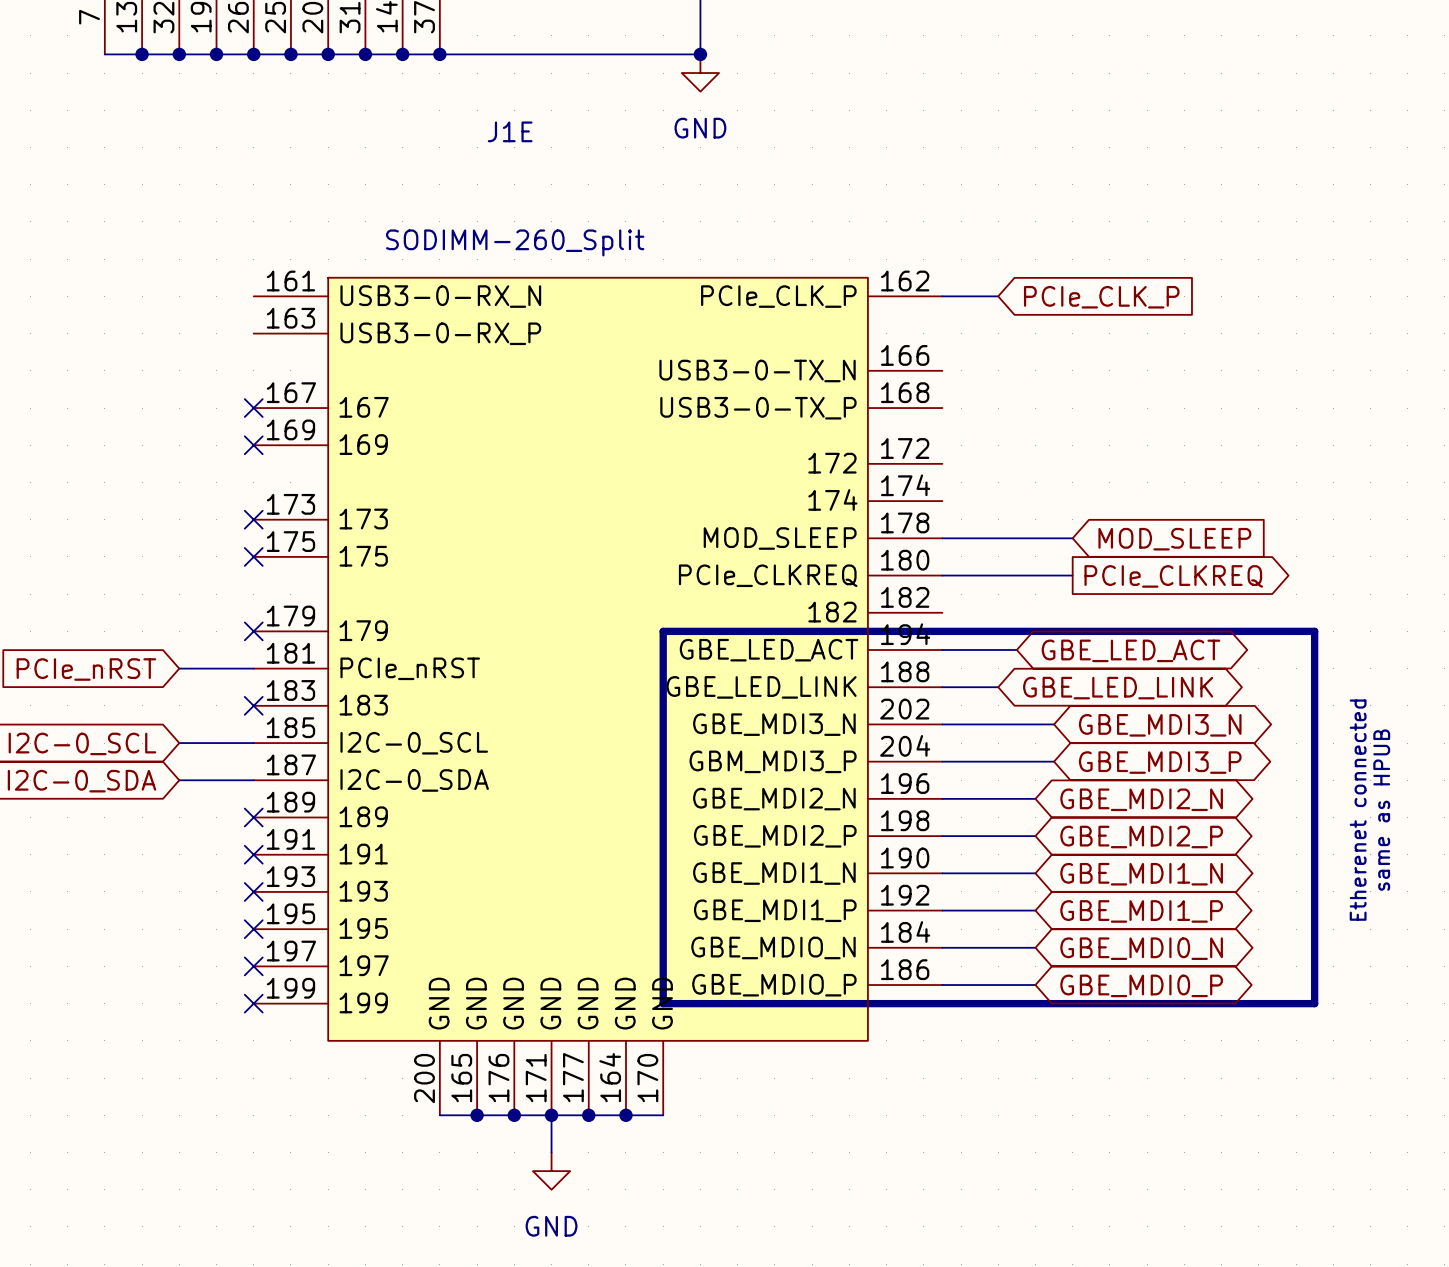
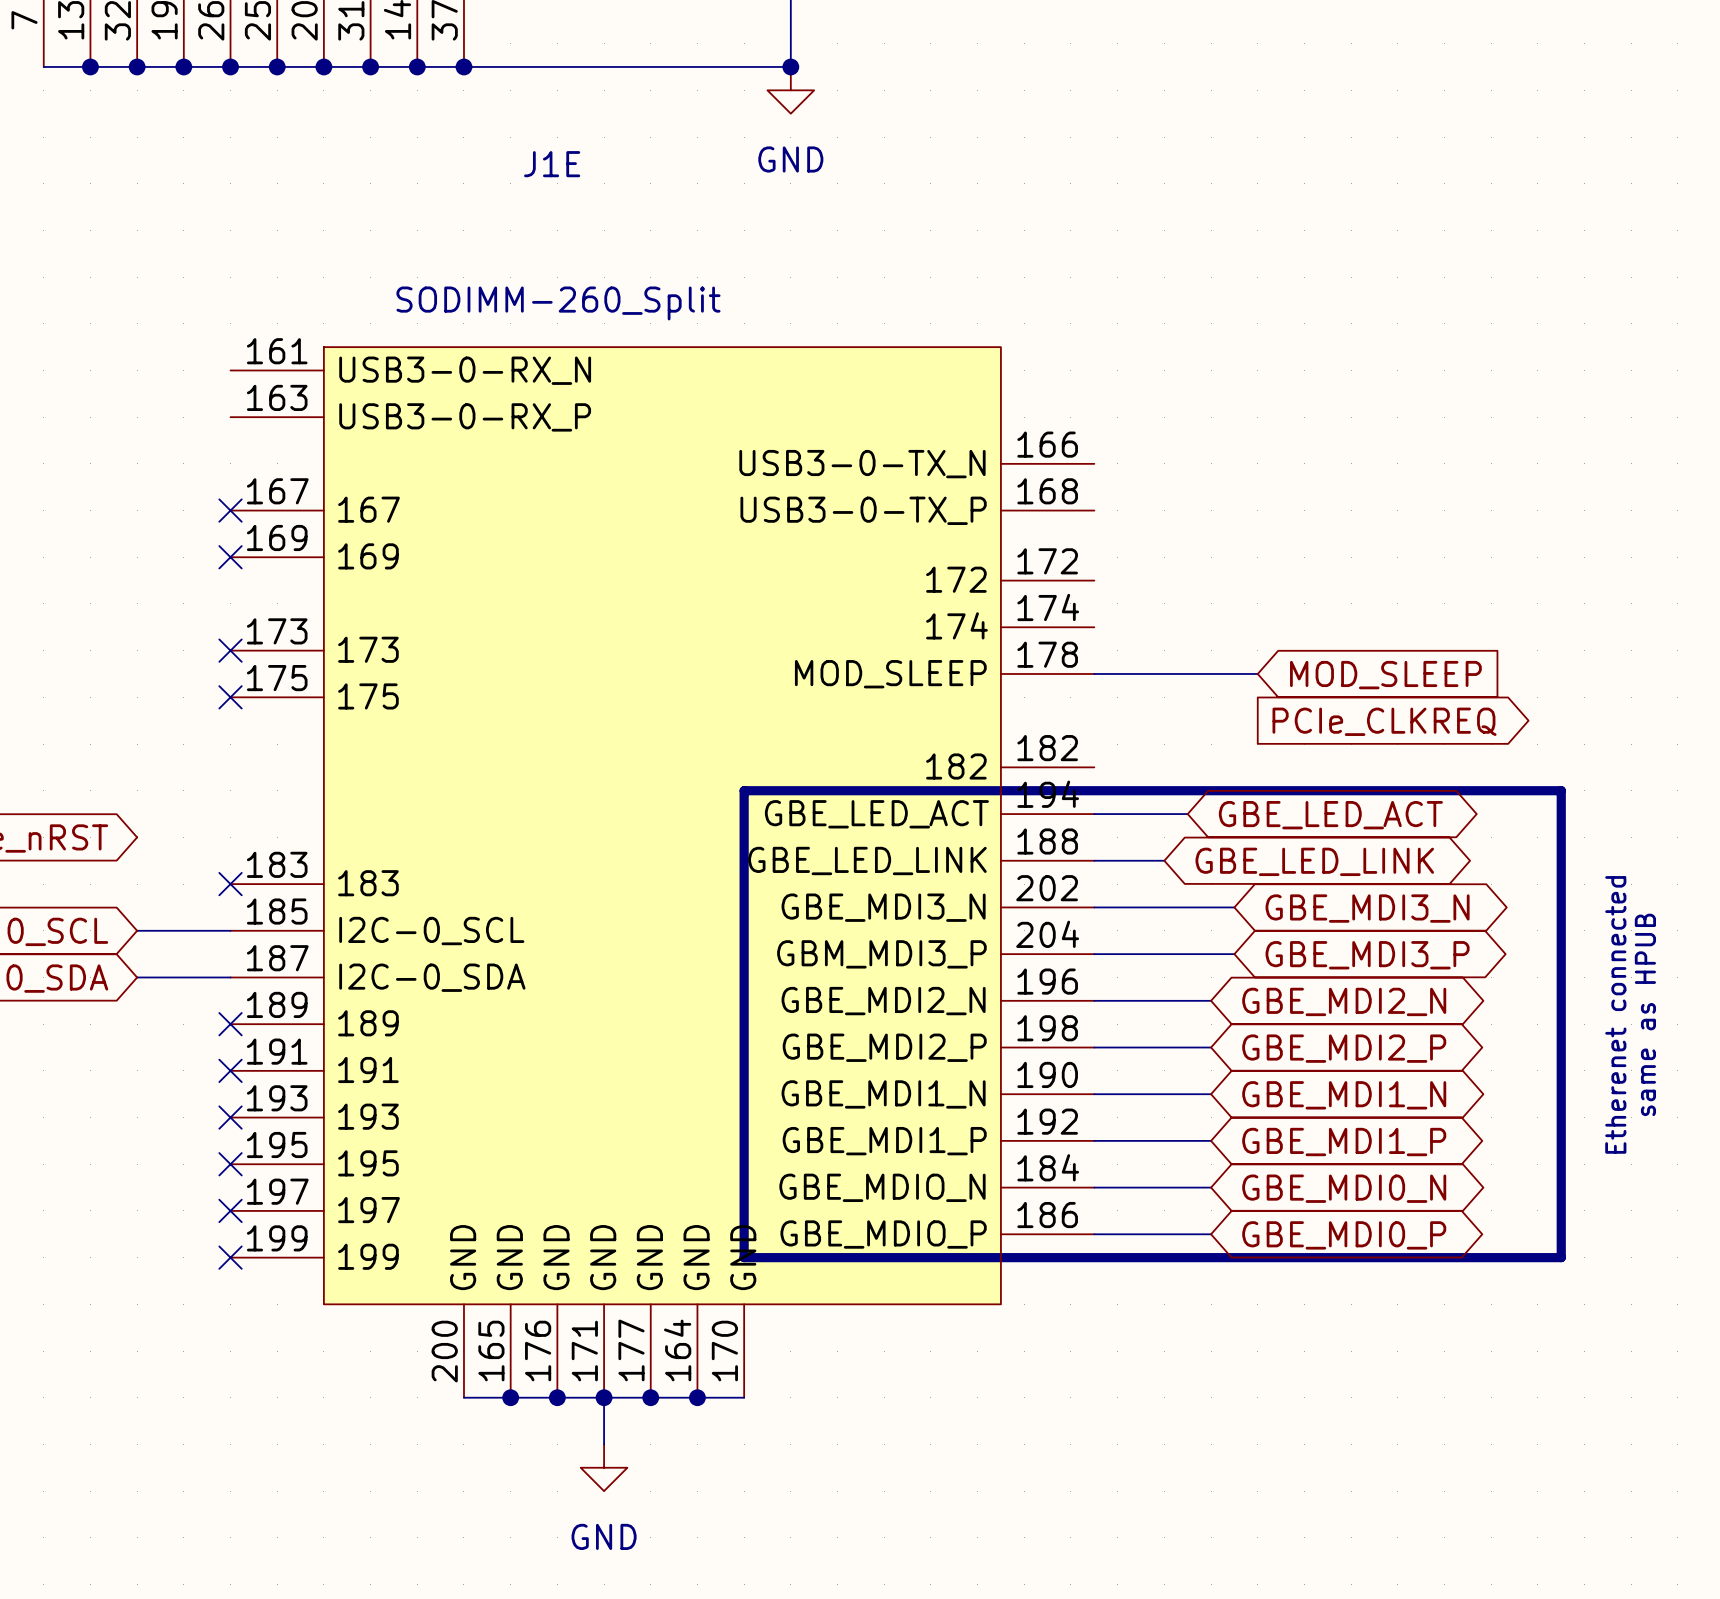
J1E symbol: [253, 277, 943, 1116] -> [230, 347, 1095, 1398]
wire: (942, 296) (998, 296) -> none
global label: PCIe_CLK_P (1101, 297) -> none
wire: (942, 575) (1072, 575) -> none
no-connect mark: (253, 631) -> none
wire: (179, 668) (253, 668) -> none

